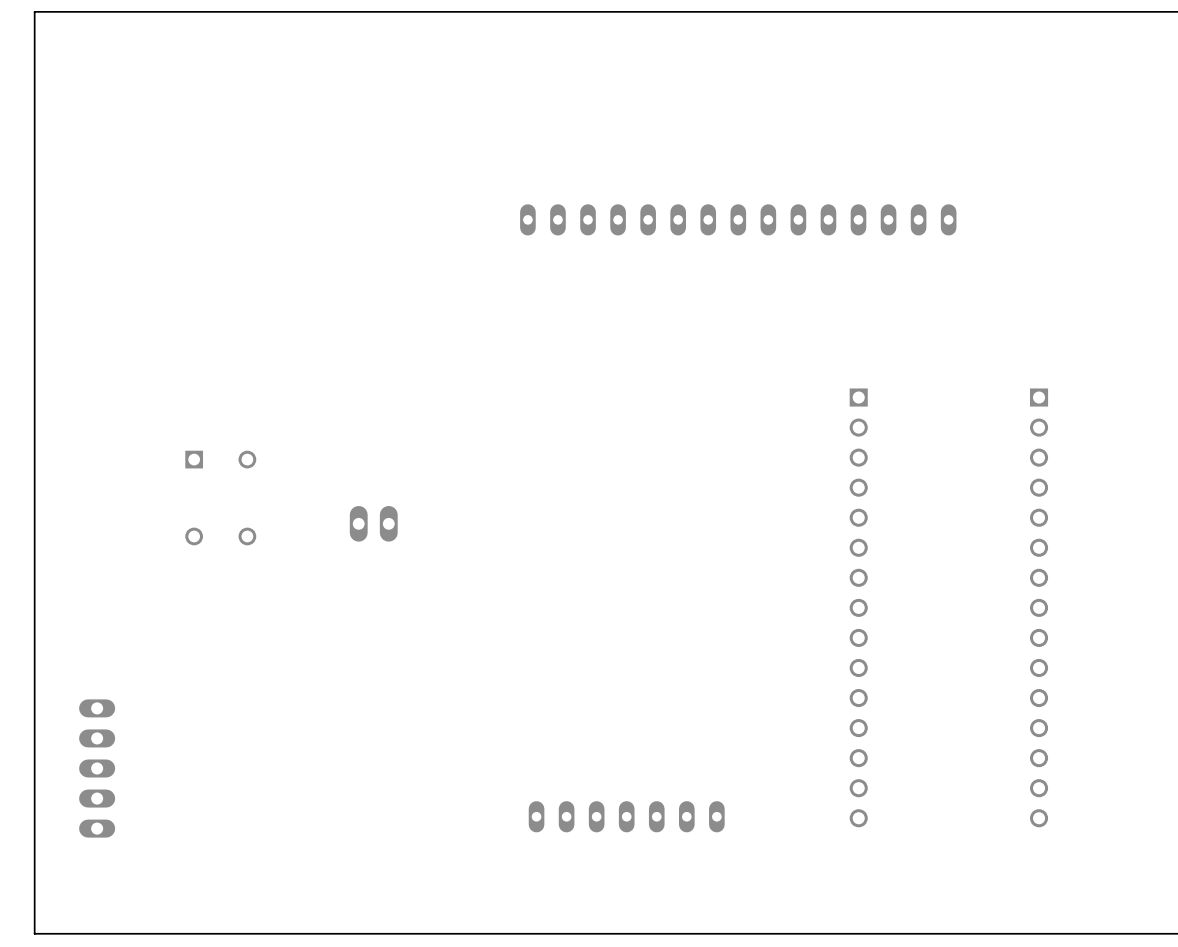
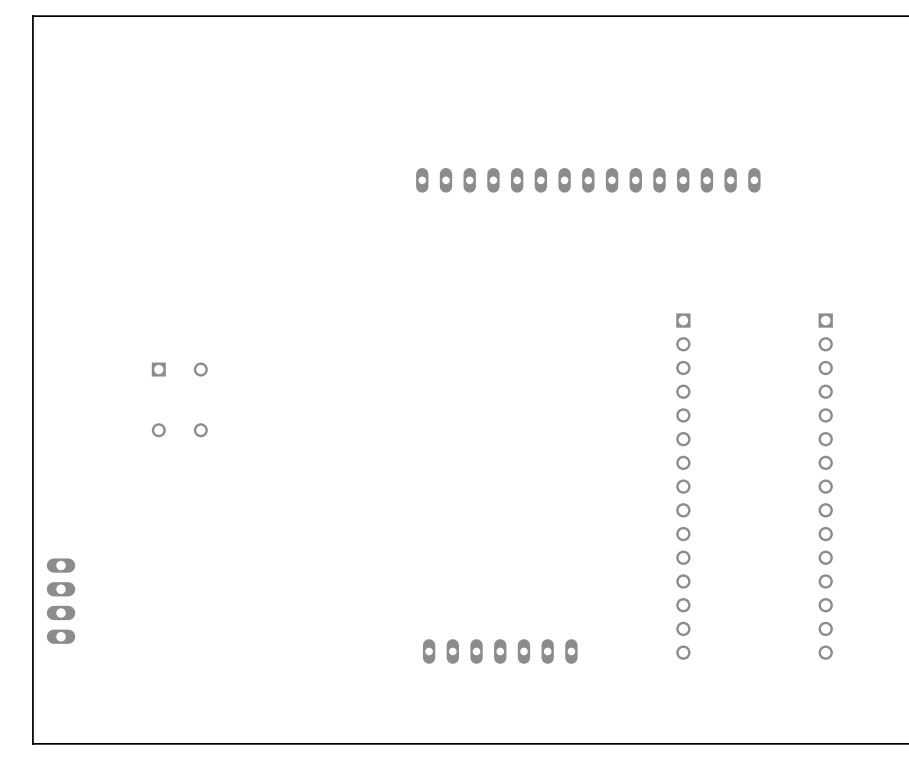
part: (373, 523) -> none
part: none -> (61, 601)
part: (97, 768) -> none

